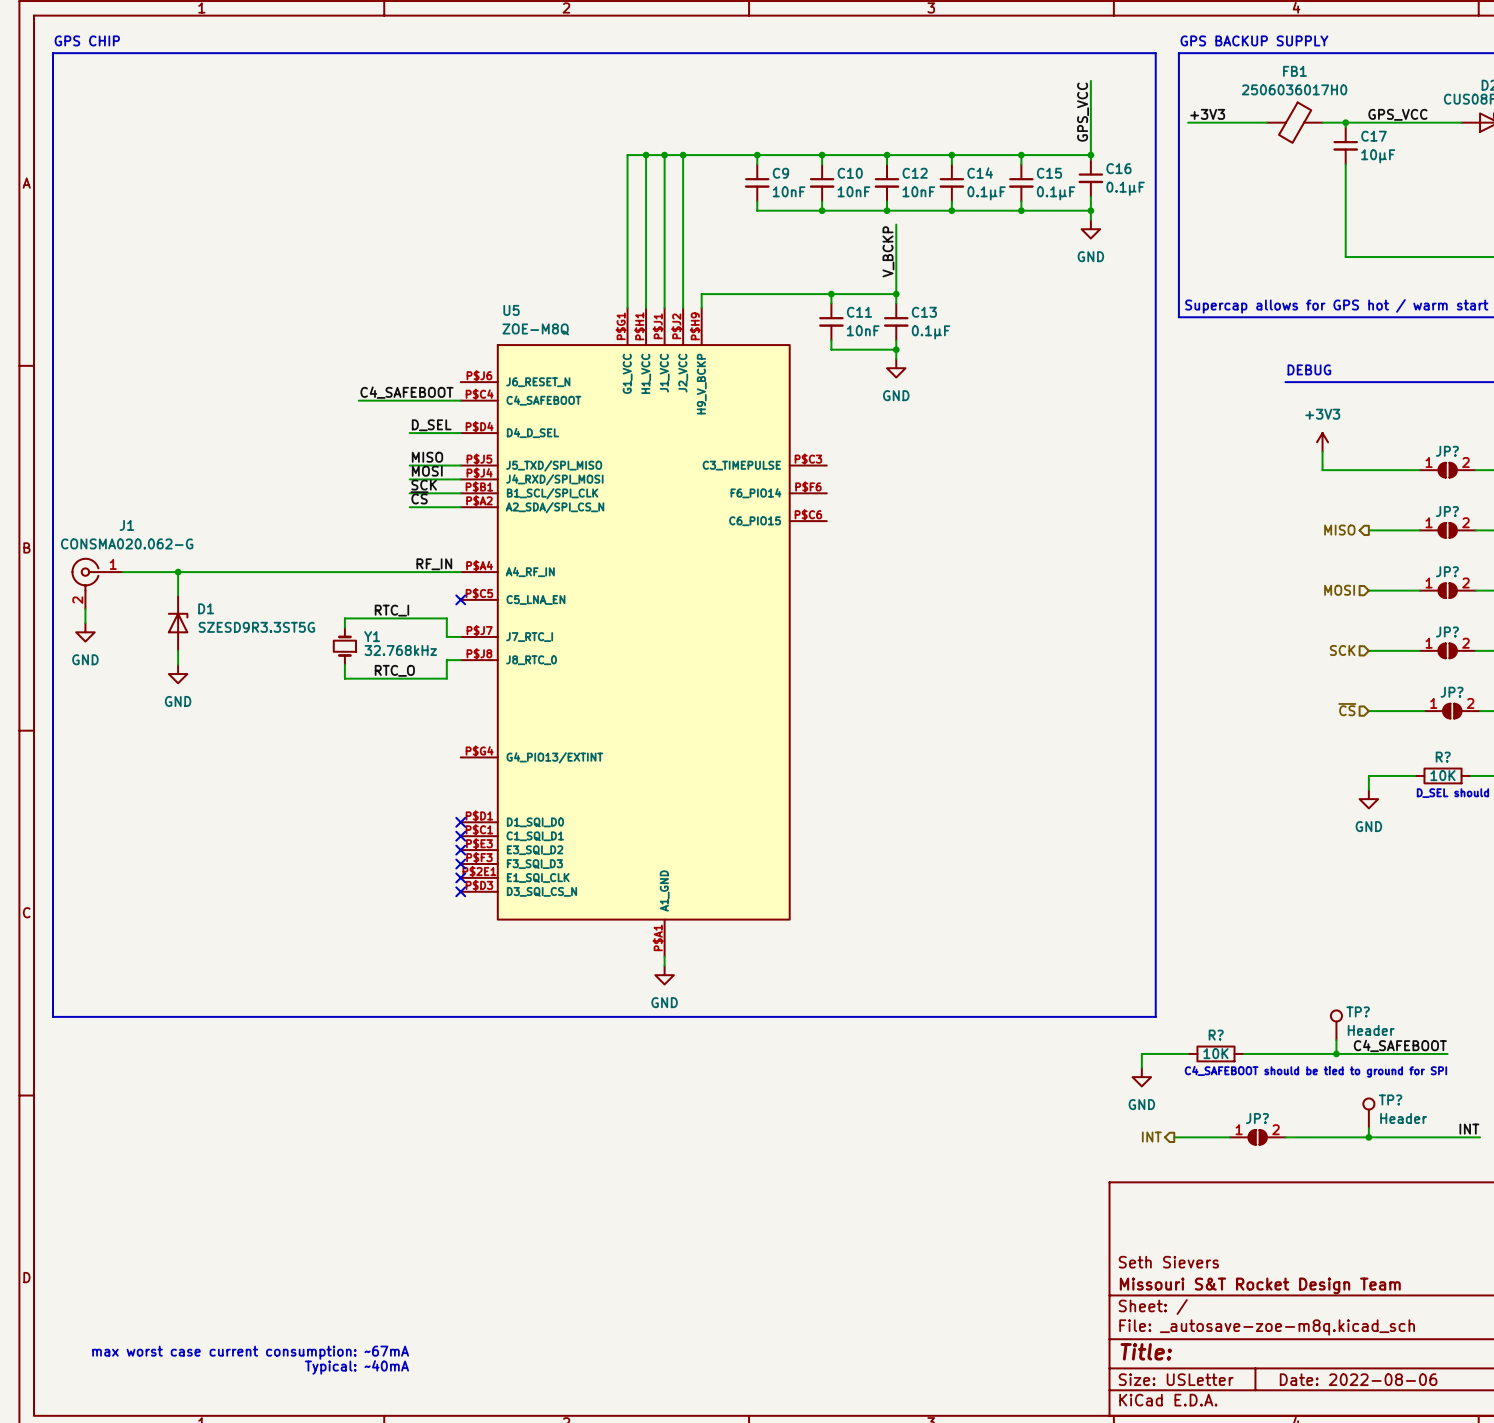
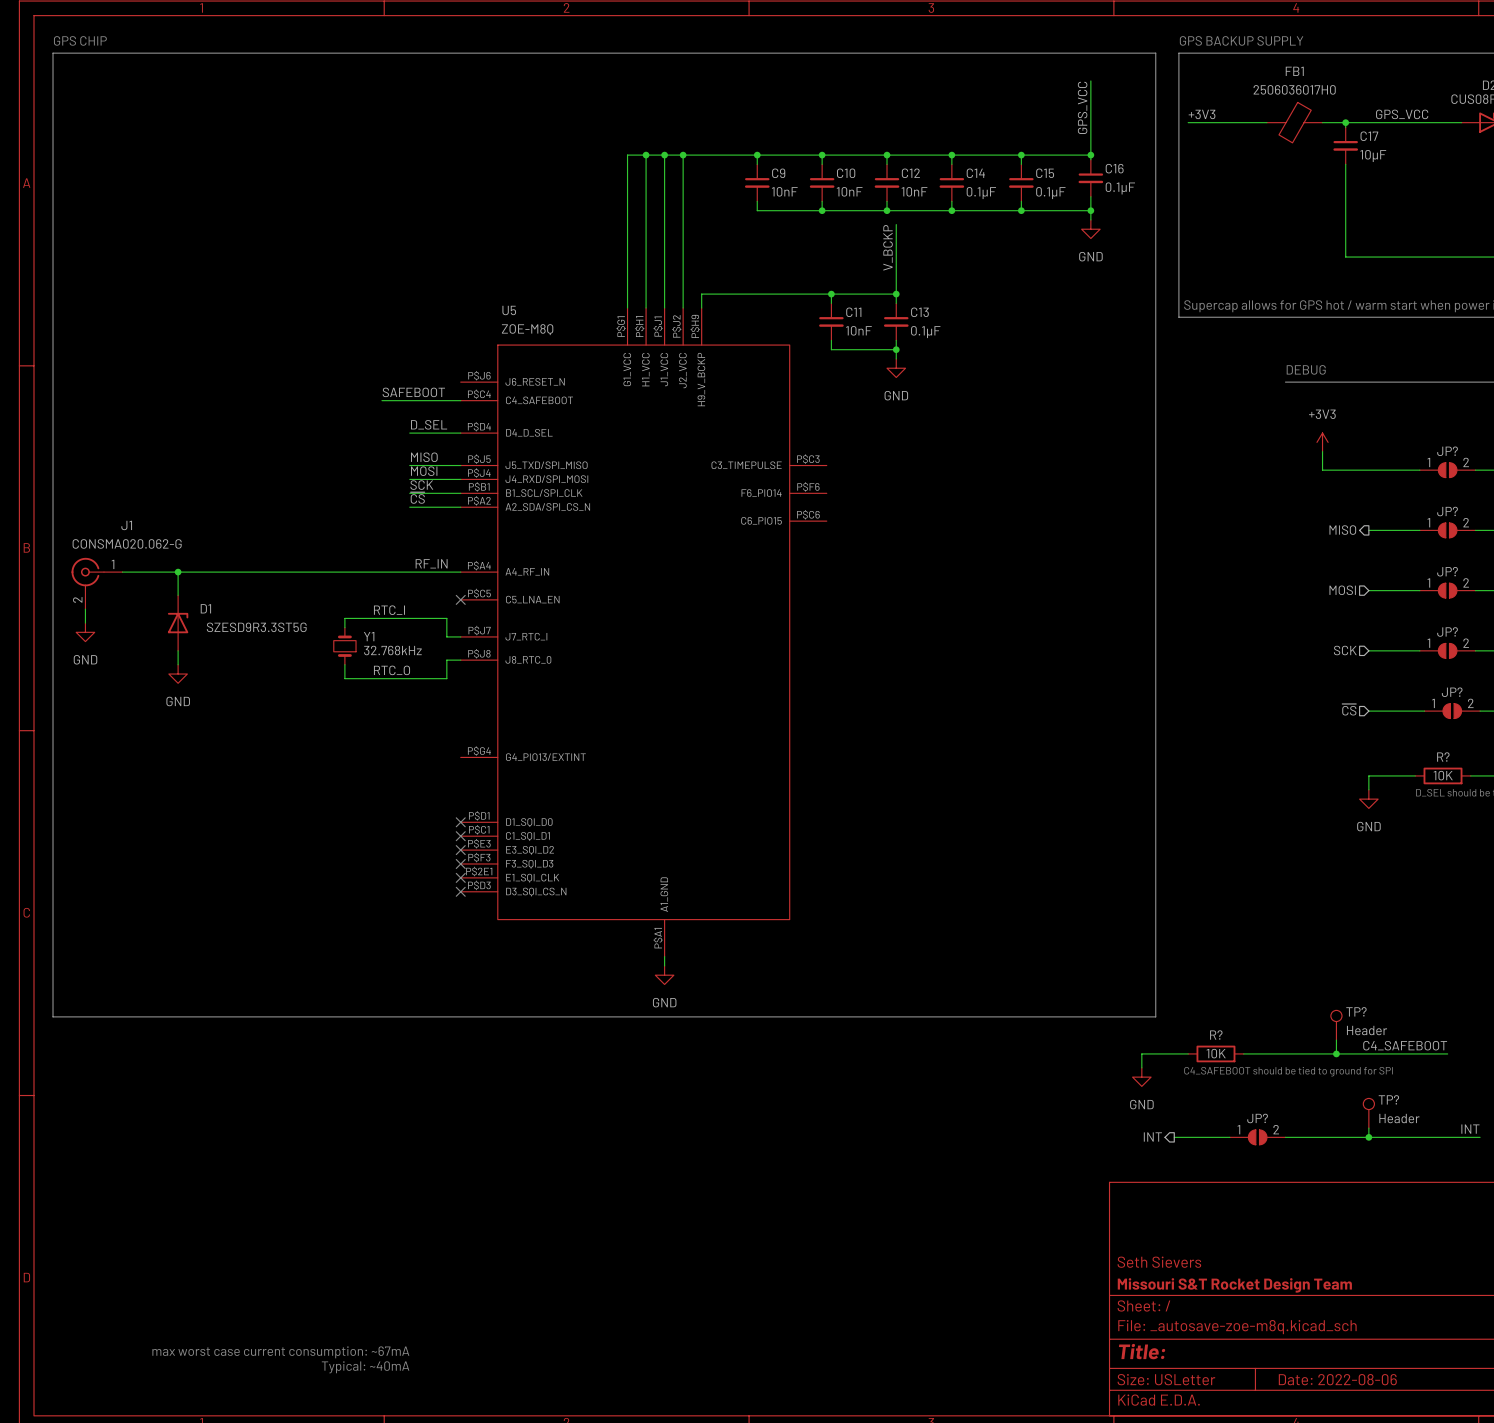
label: C4_SAFEBOOT (406, 392) -> SAFEBOOT (413, 392)
wire: (358, 400) (381, 400) -> none

